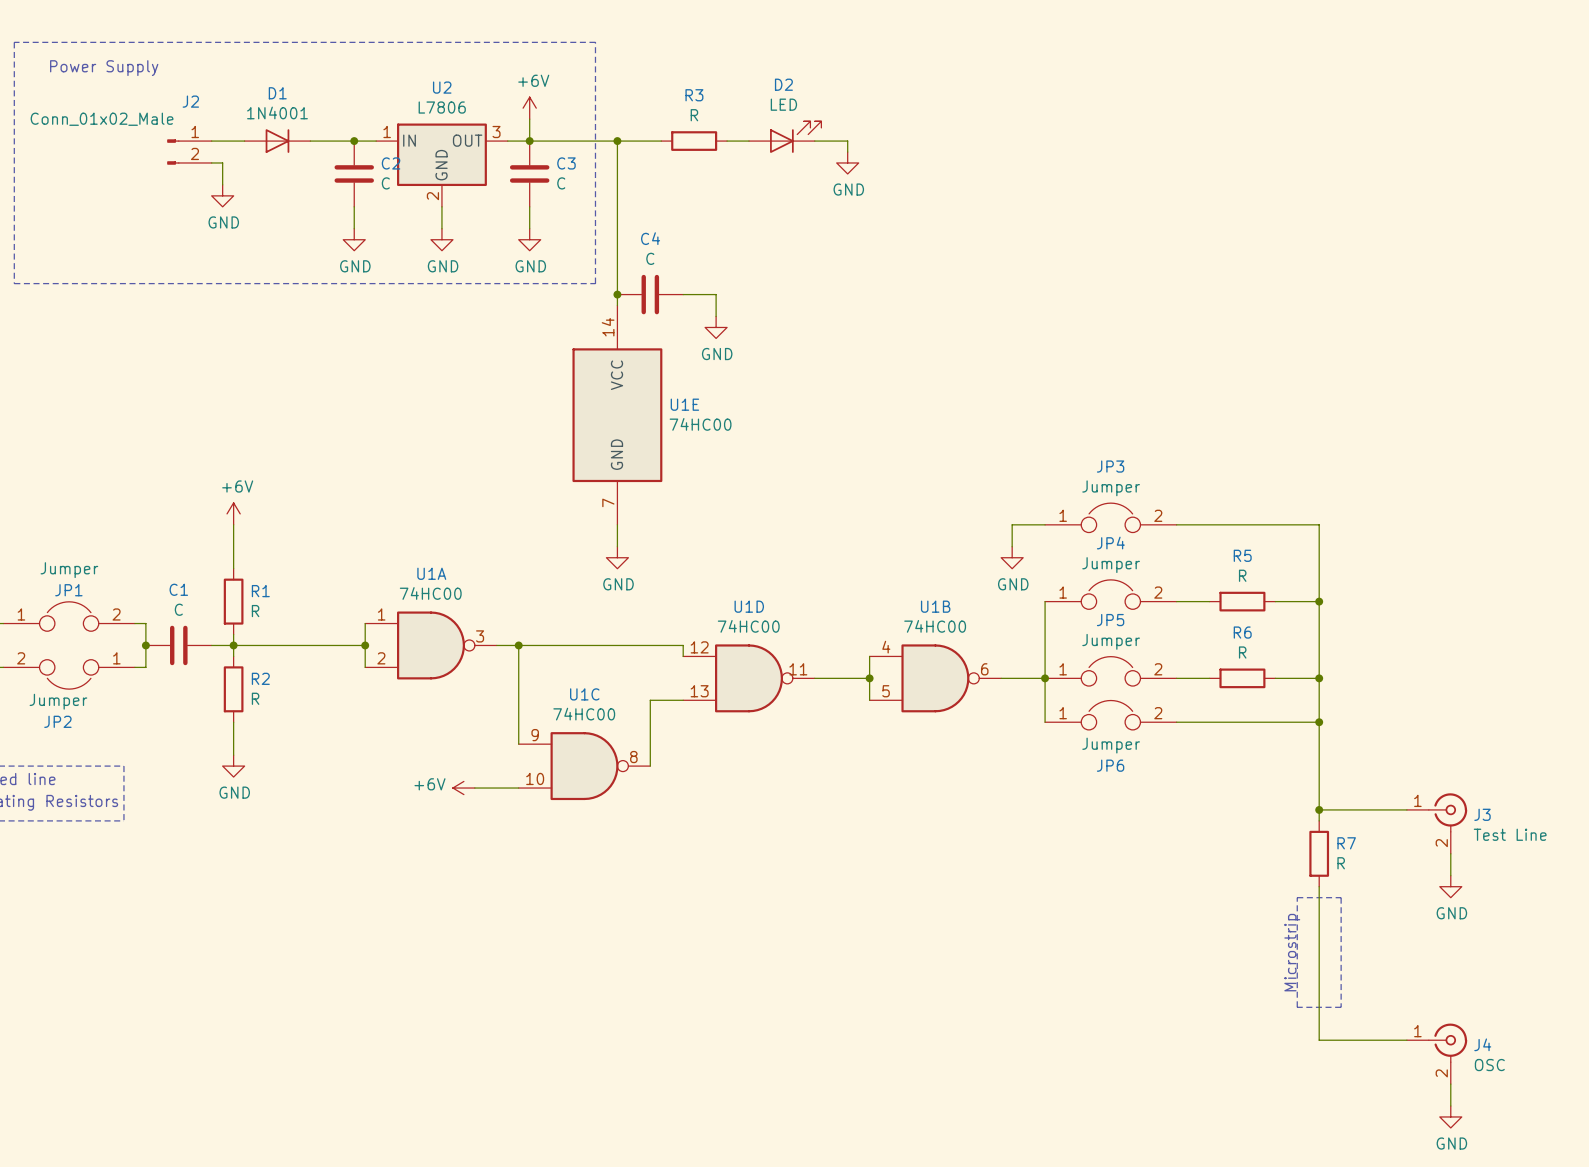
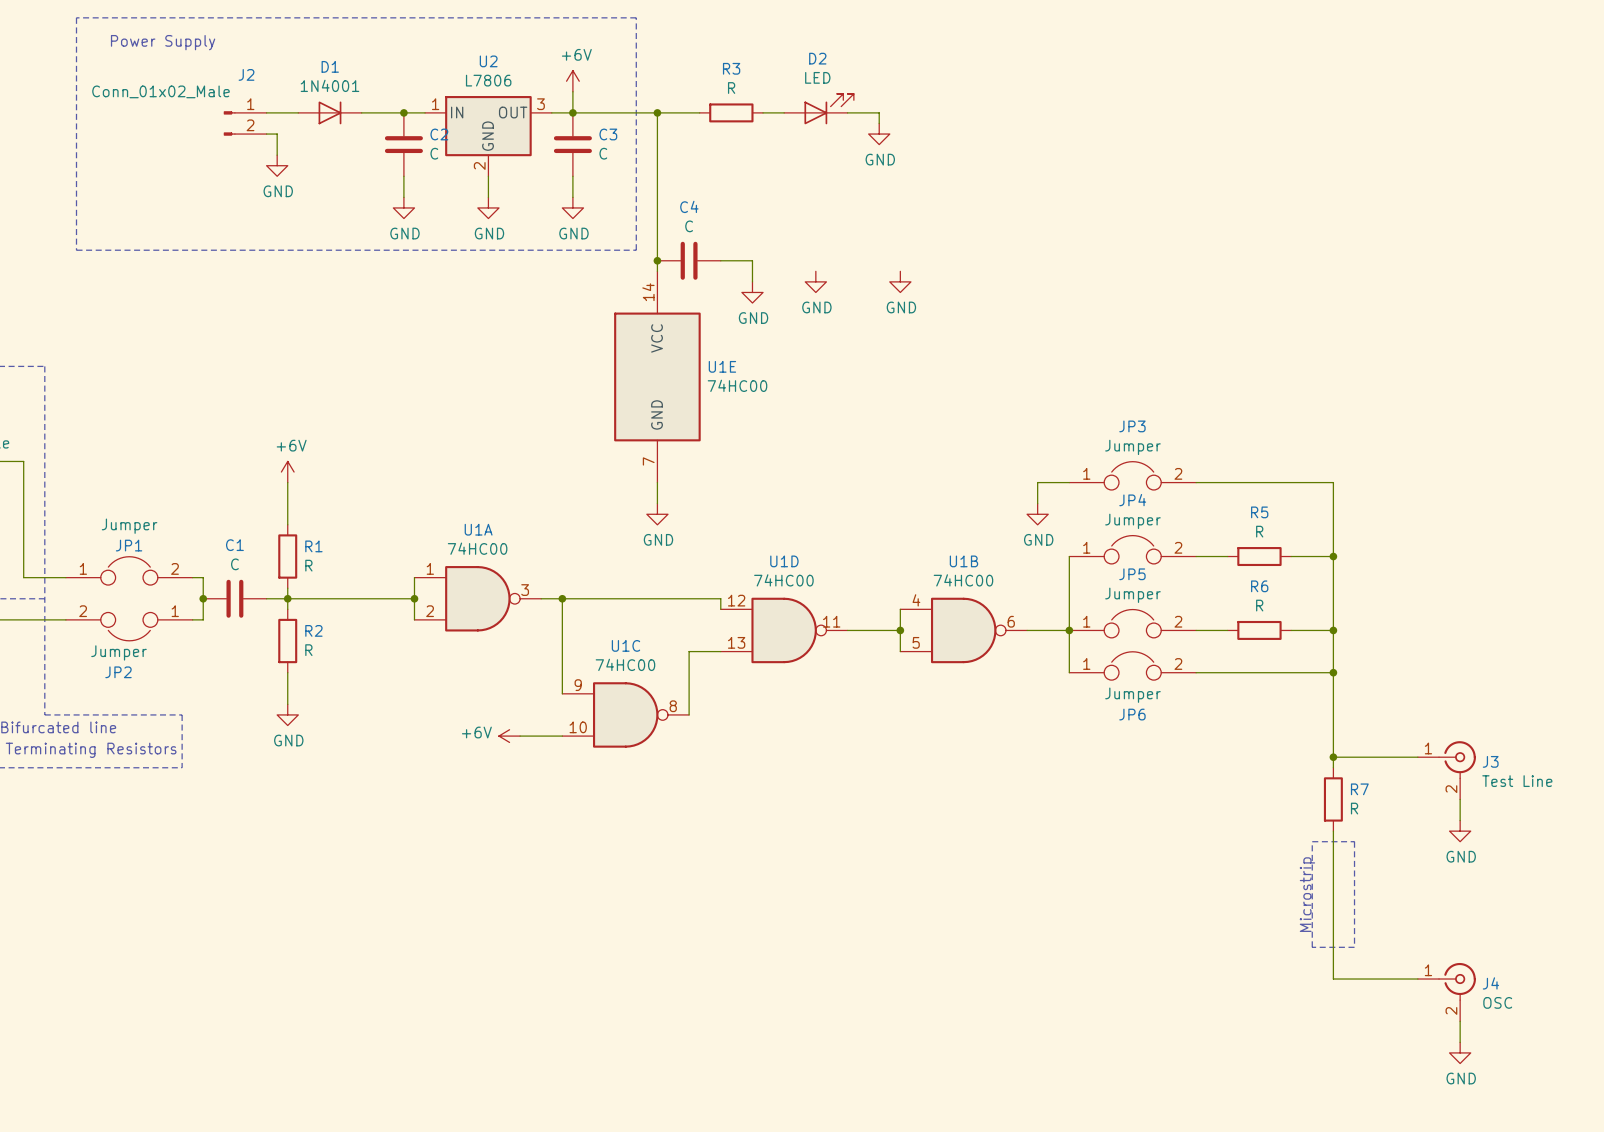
power symbol: none -> GND (815, 281)
power symbol: none -> GND (900, 281)

